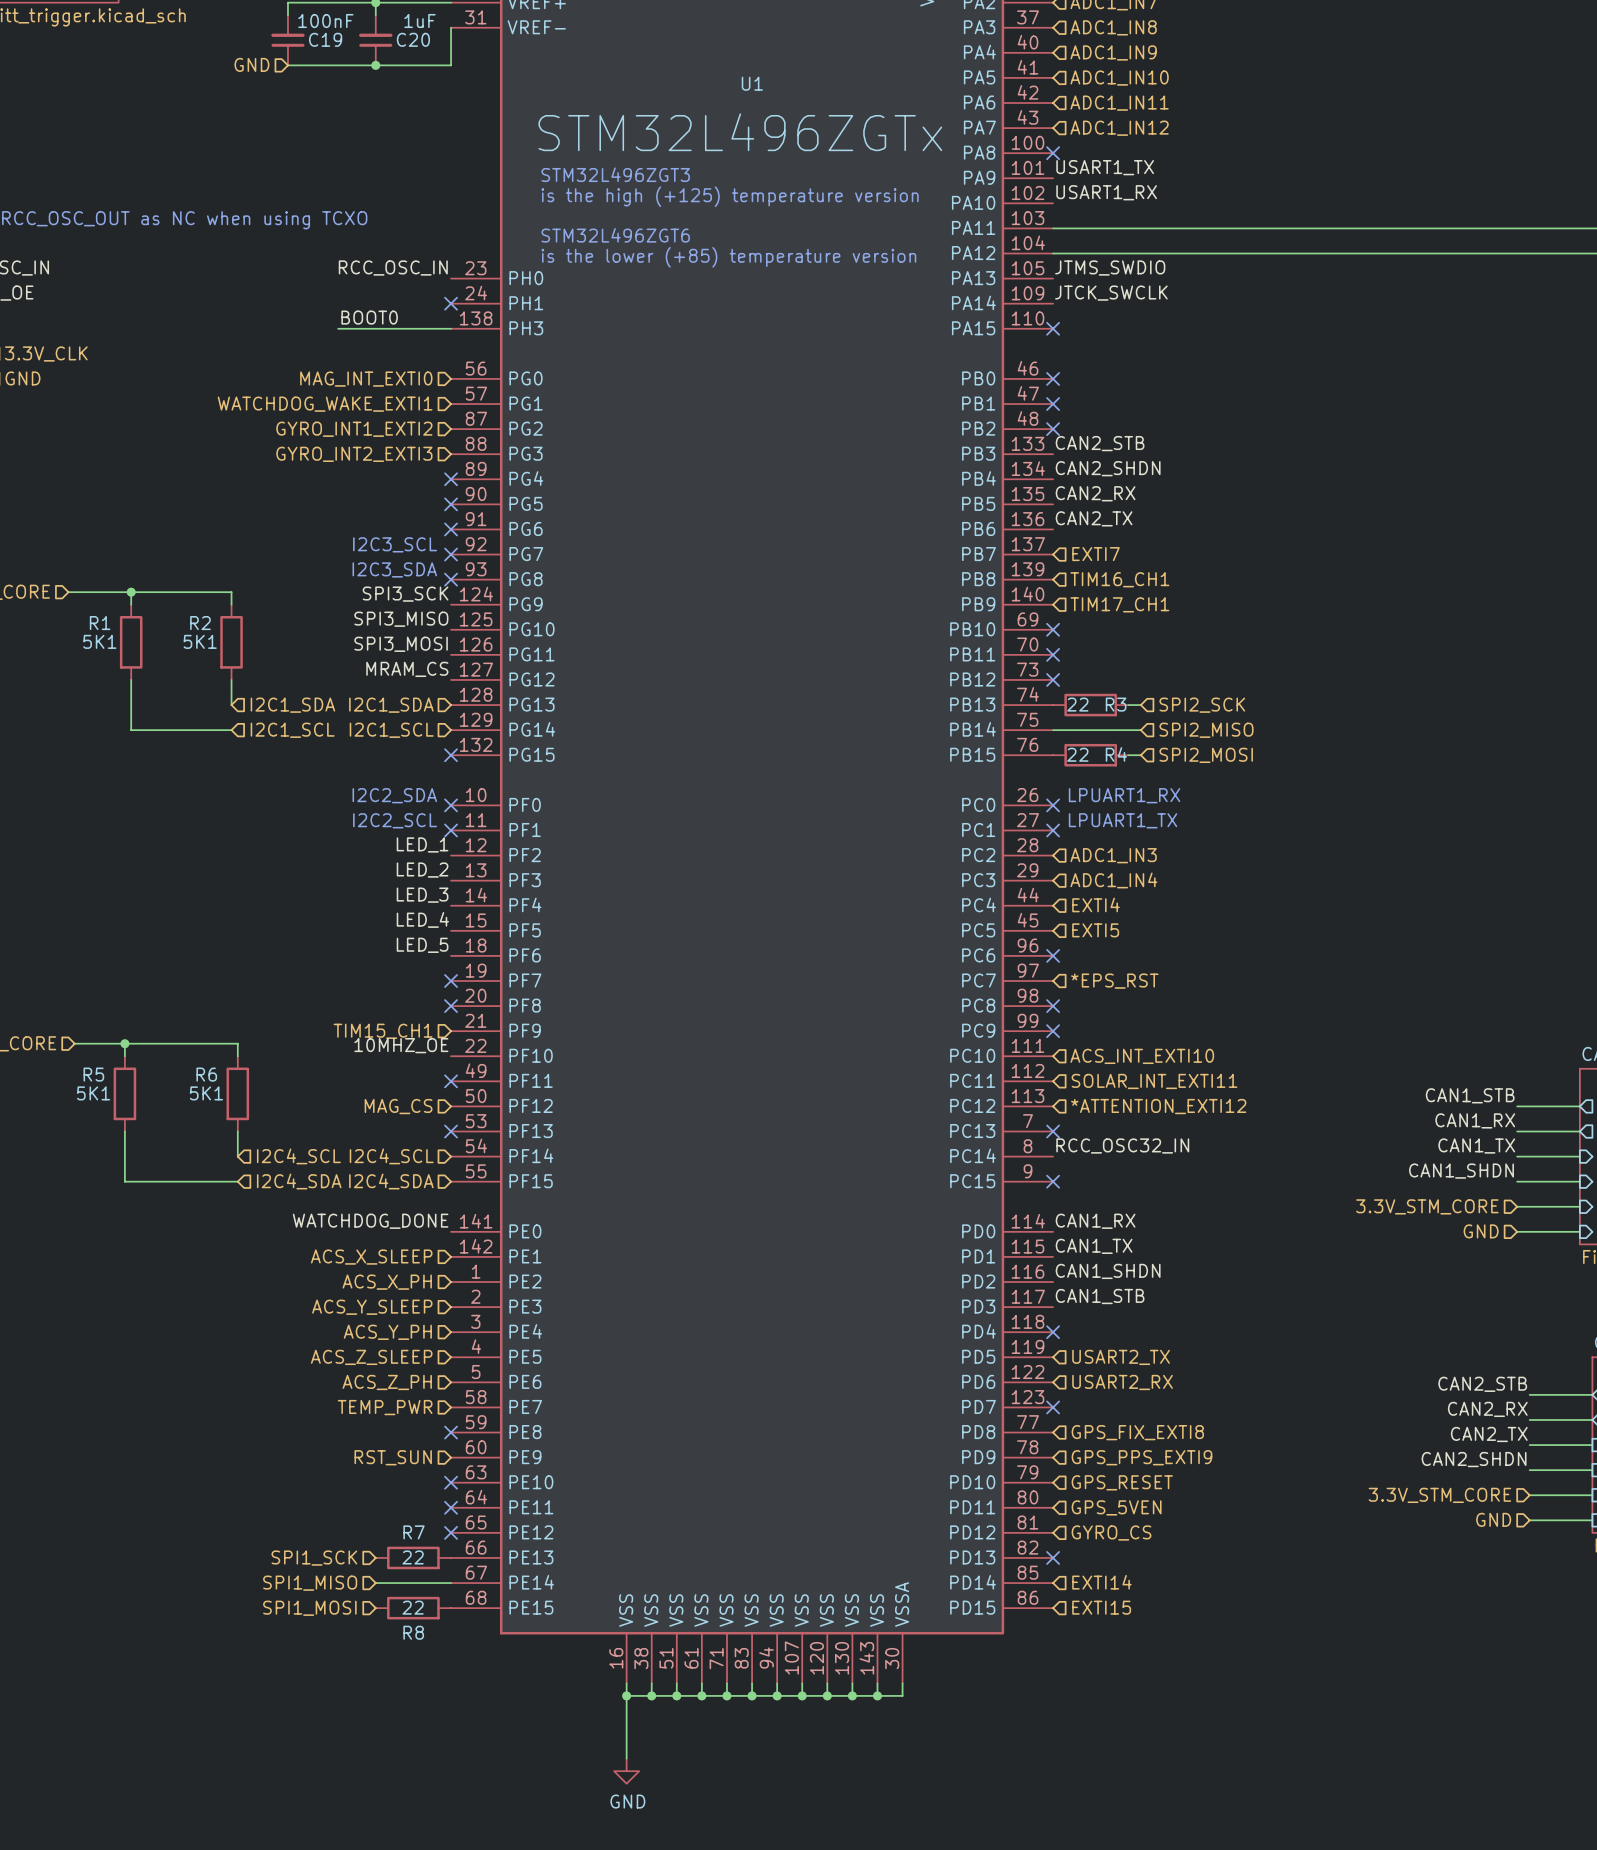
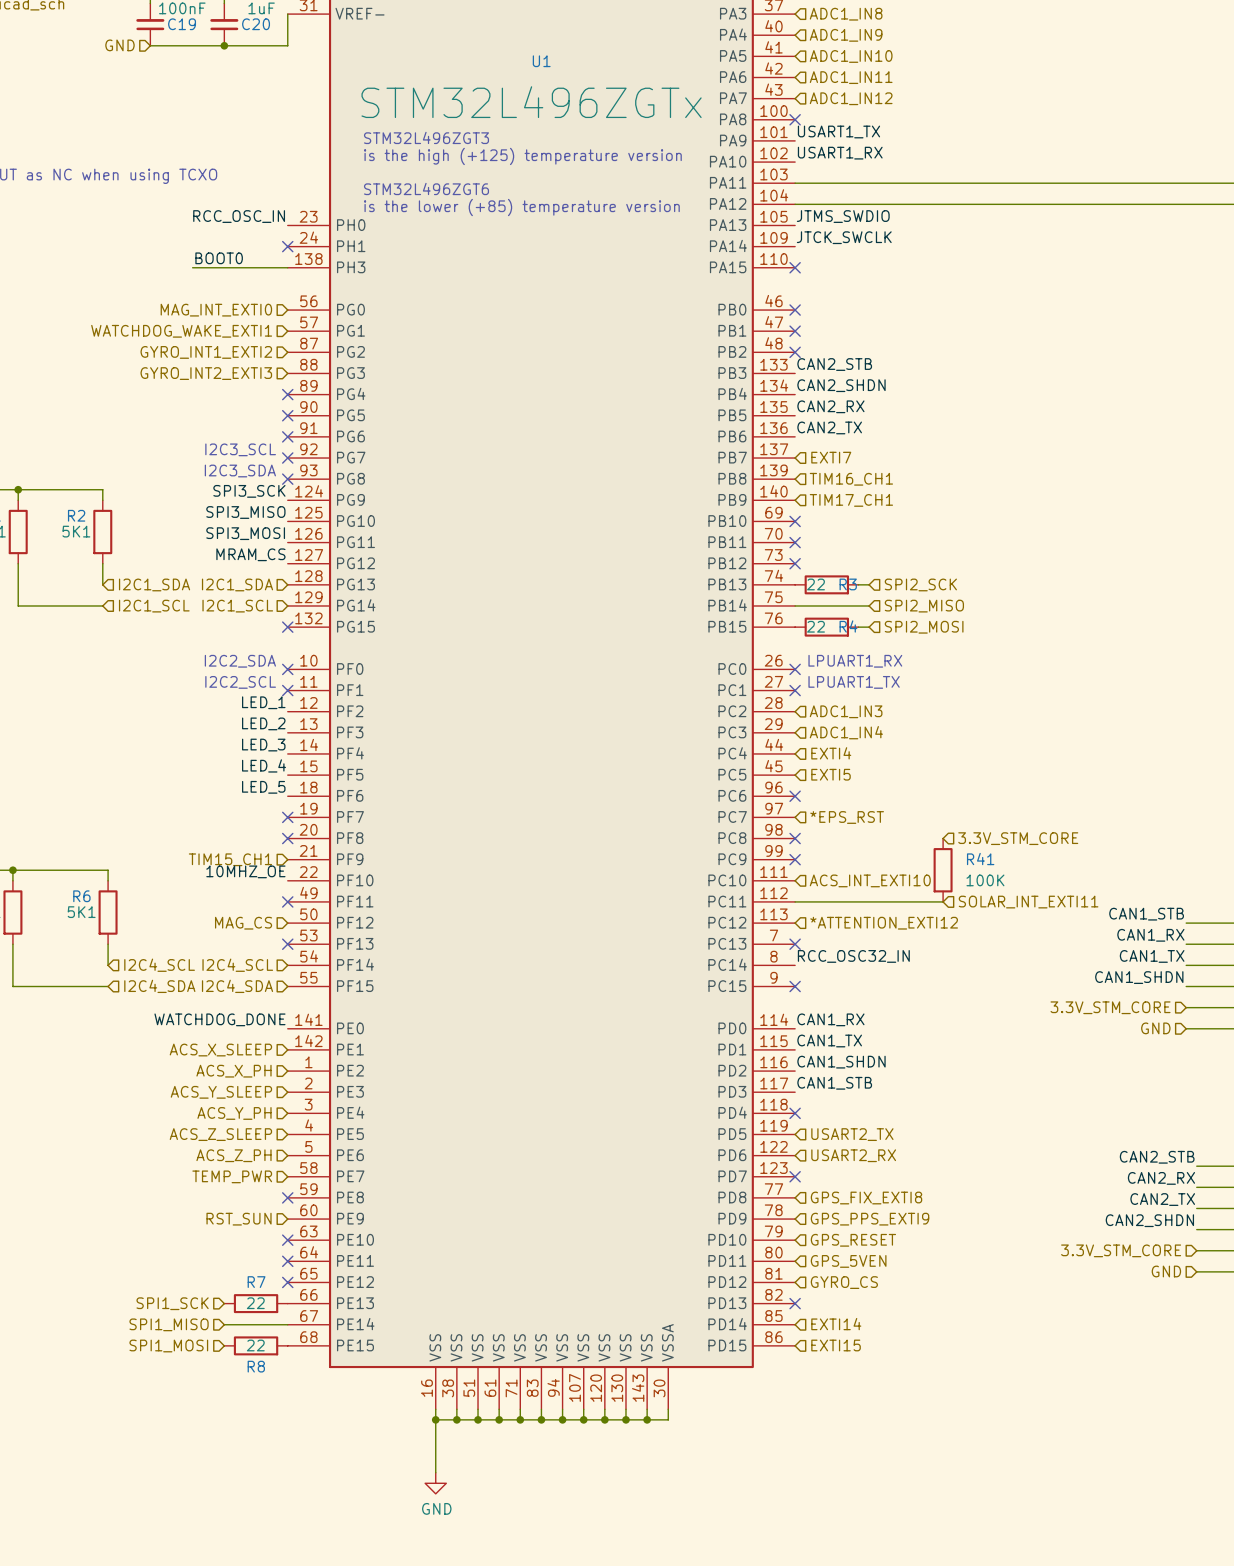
hierarchical label: none -> 3.3V_STM_CORE (1018, 838)
R41: none -> 100K (943, 870)
wire: none -> (795, 901) (943, 901)
hierarchical label position: SOLAR_INT_EXTI11 (1154, 1081) -> SOLAR_INT_EXTI11 (1028, 902)

